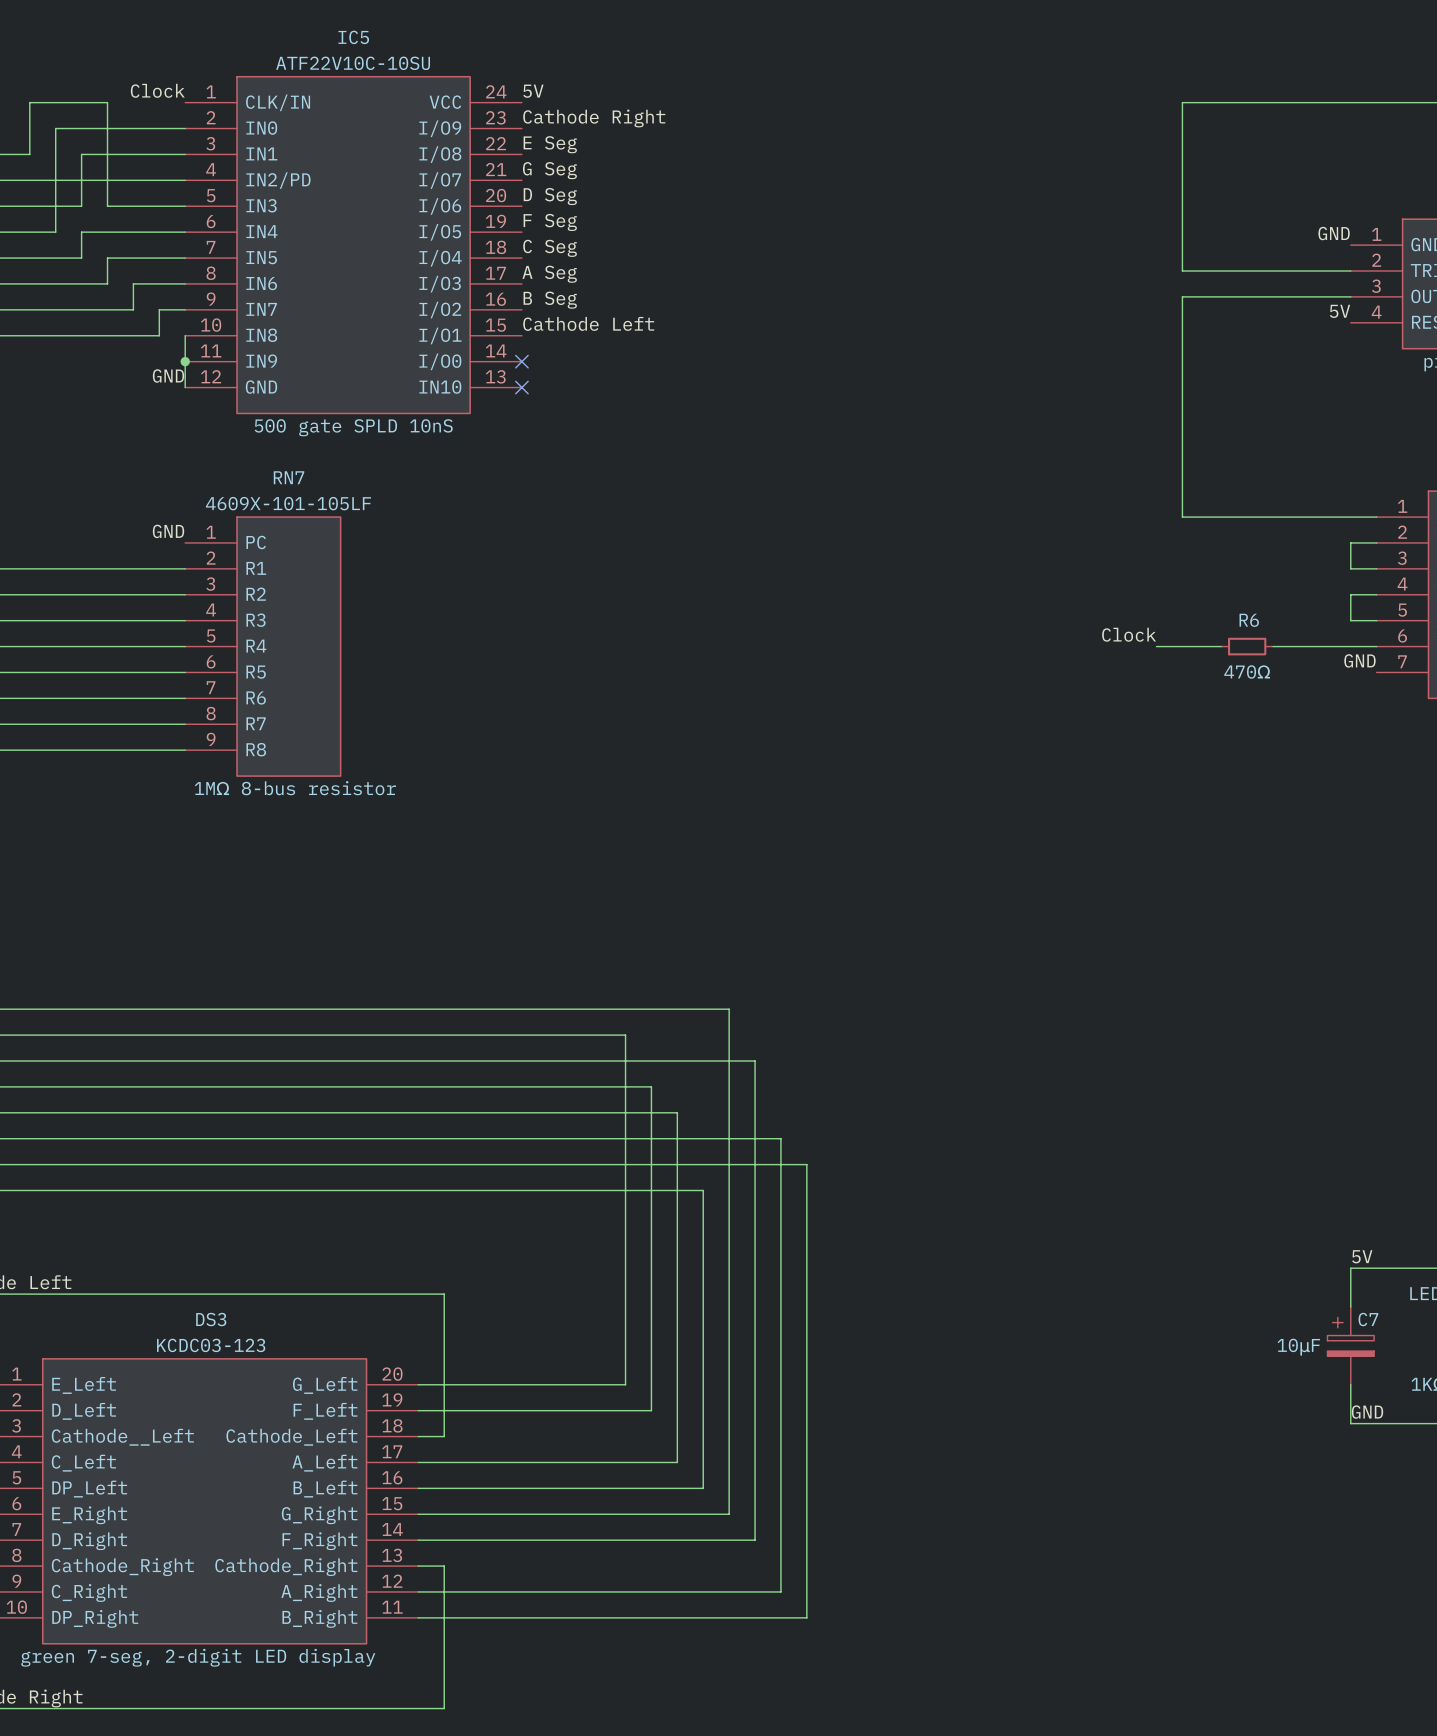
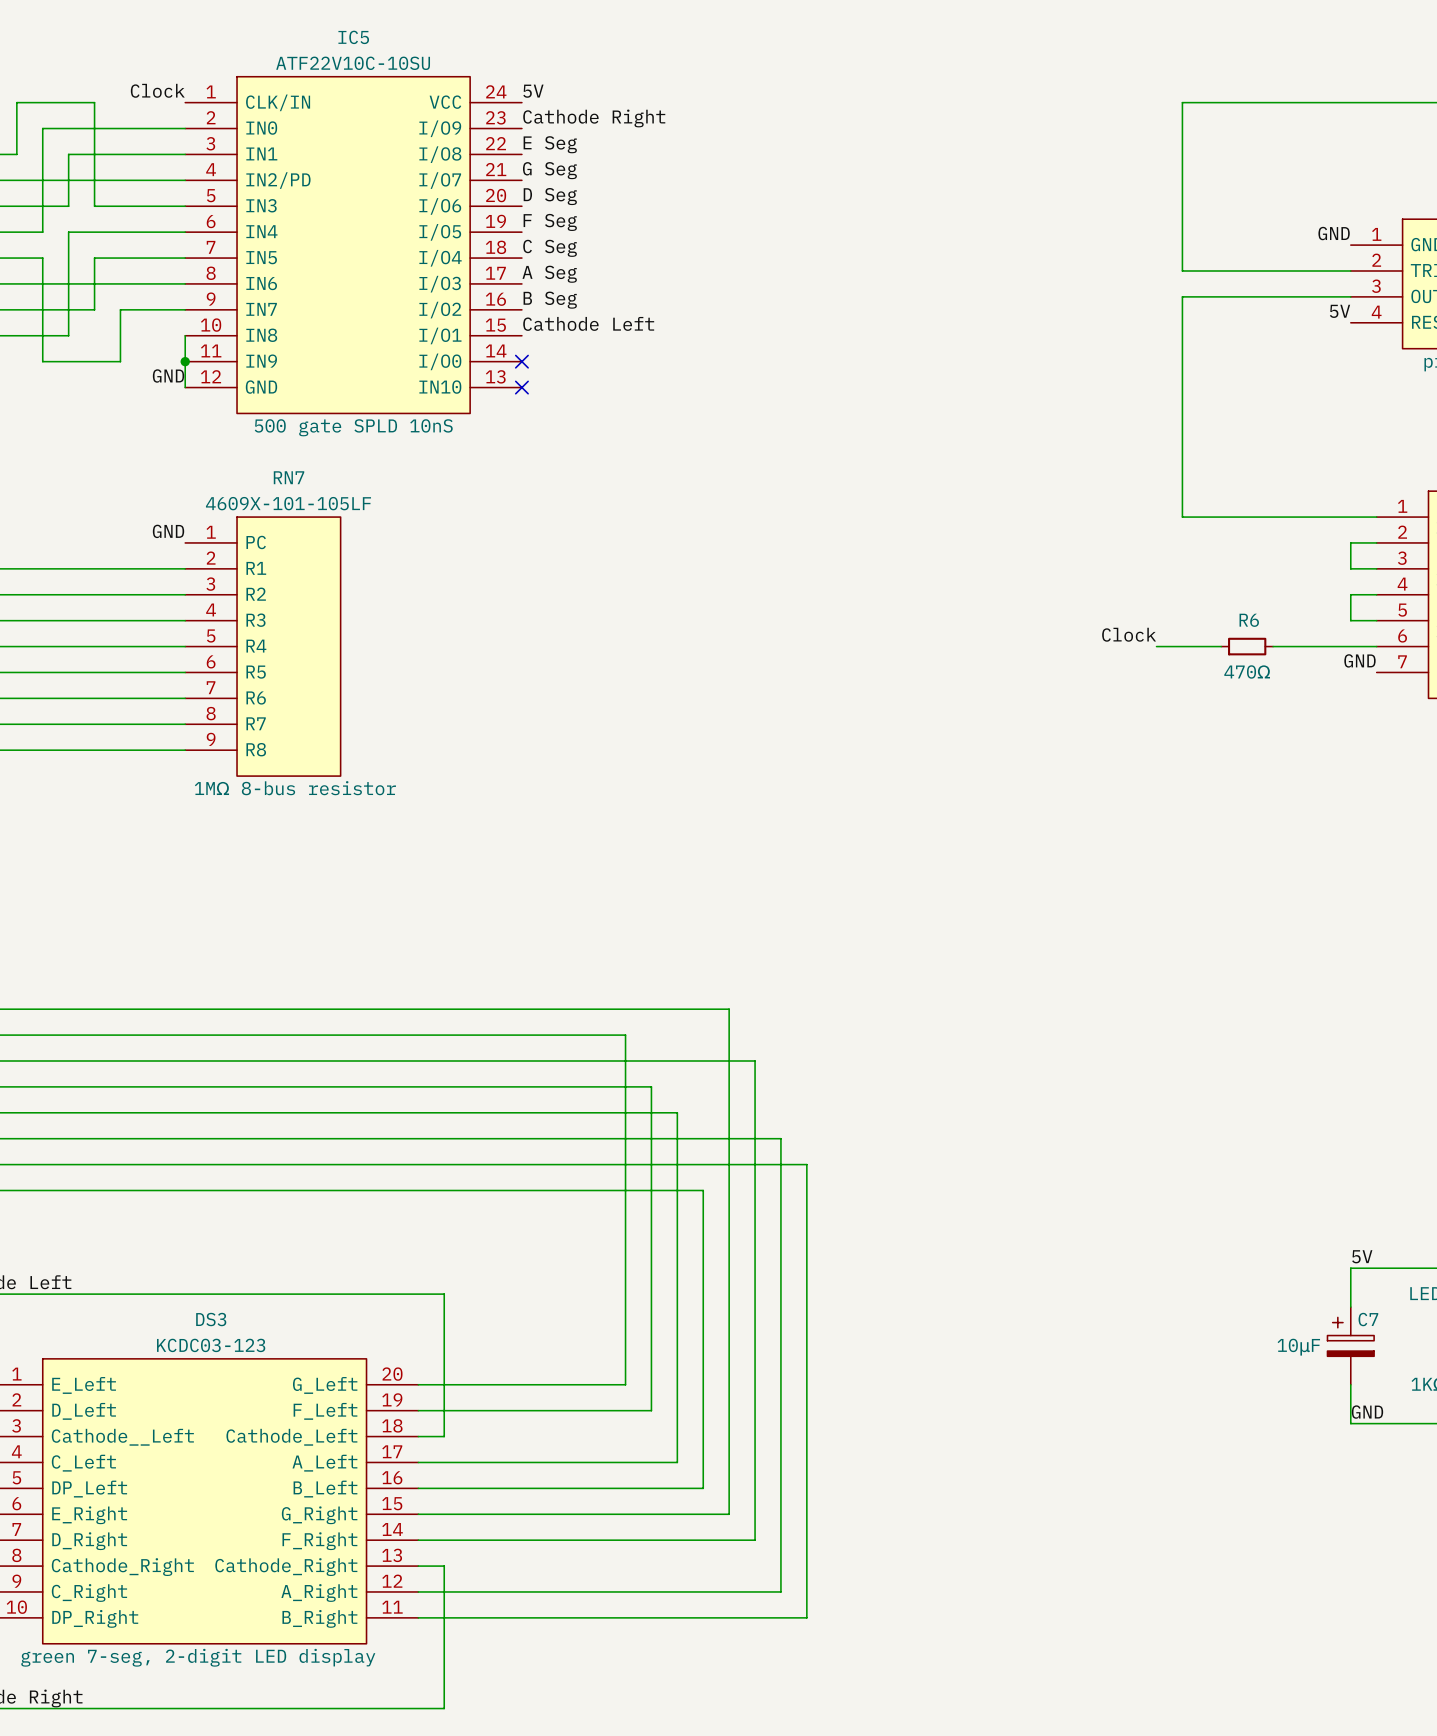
wire: (29, 102) (29, 154) (16, 154) -> (29, 102) (16, 102) (16, 154)
wire: (94, 102) (107, 102) (107, 206) -> (94, 102) (94, 206) (107, 206)
wire: (55, 128) (55, 232) (42, 232) -> (55, 128) (42, 128) (42, 232)
wire: (81, 154) (81, 206) (68, 206) -> (81, 154) (68, 154) (68, 206)
wire: (81, 232) (81, 258) (42, 258) -> (81, 232) (68, 232) (68, 335)
wire: (107, 258) (107, 283) -> (107, 258) (94, 258) (94, 309)
wire: (133, 283) (133, 309) -> (133, 283) (107, 283)
wire: (94, 309) (120, 309) -> (42, 258) (42, 361) (120, 361) (120, 309)
wire: (159, 309) (159, 335) (68, 335) -> (159, 309) (133, 309)

